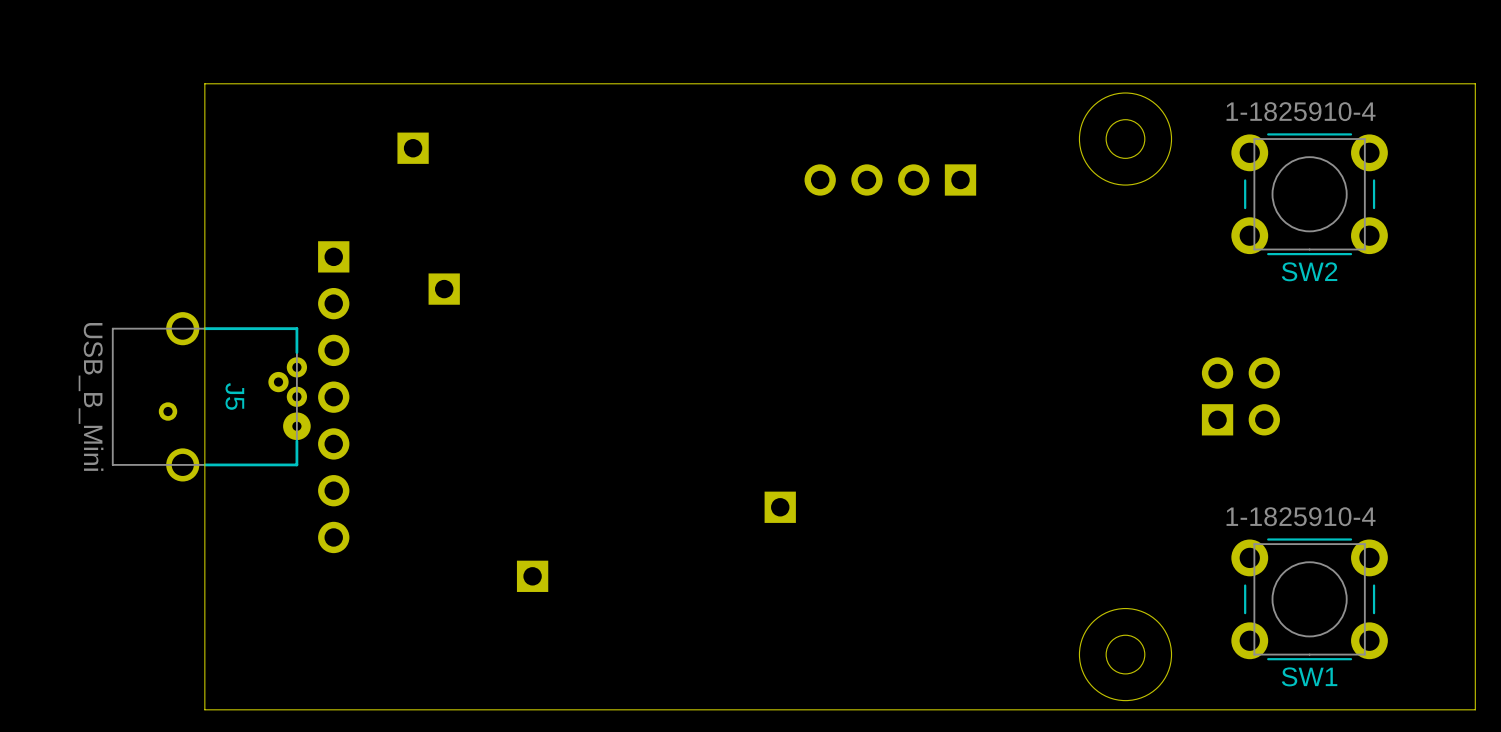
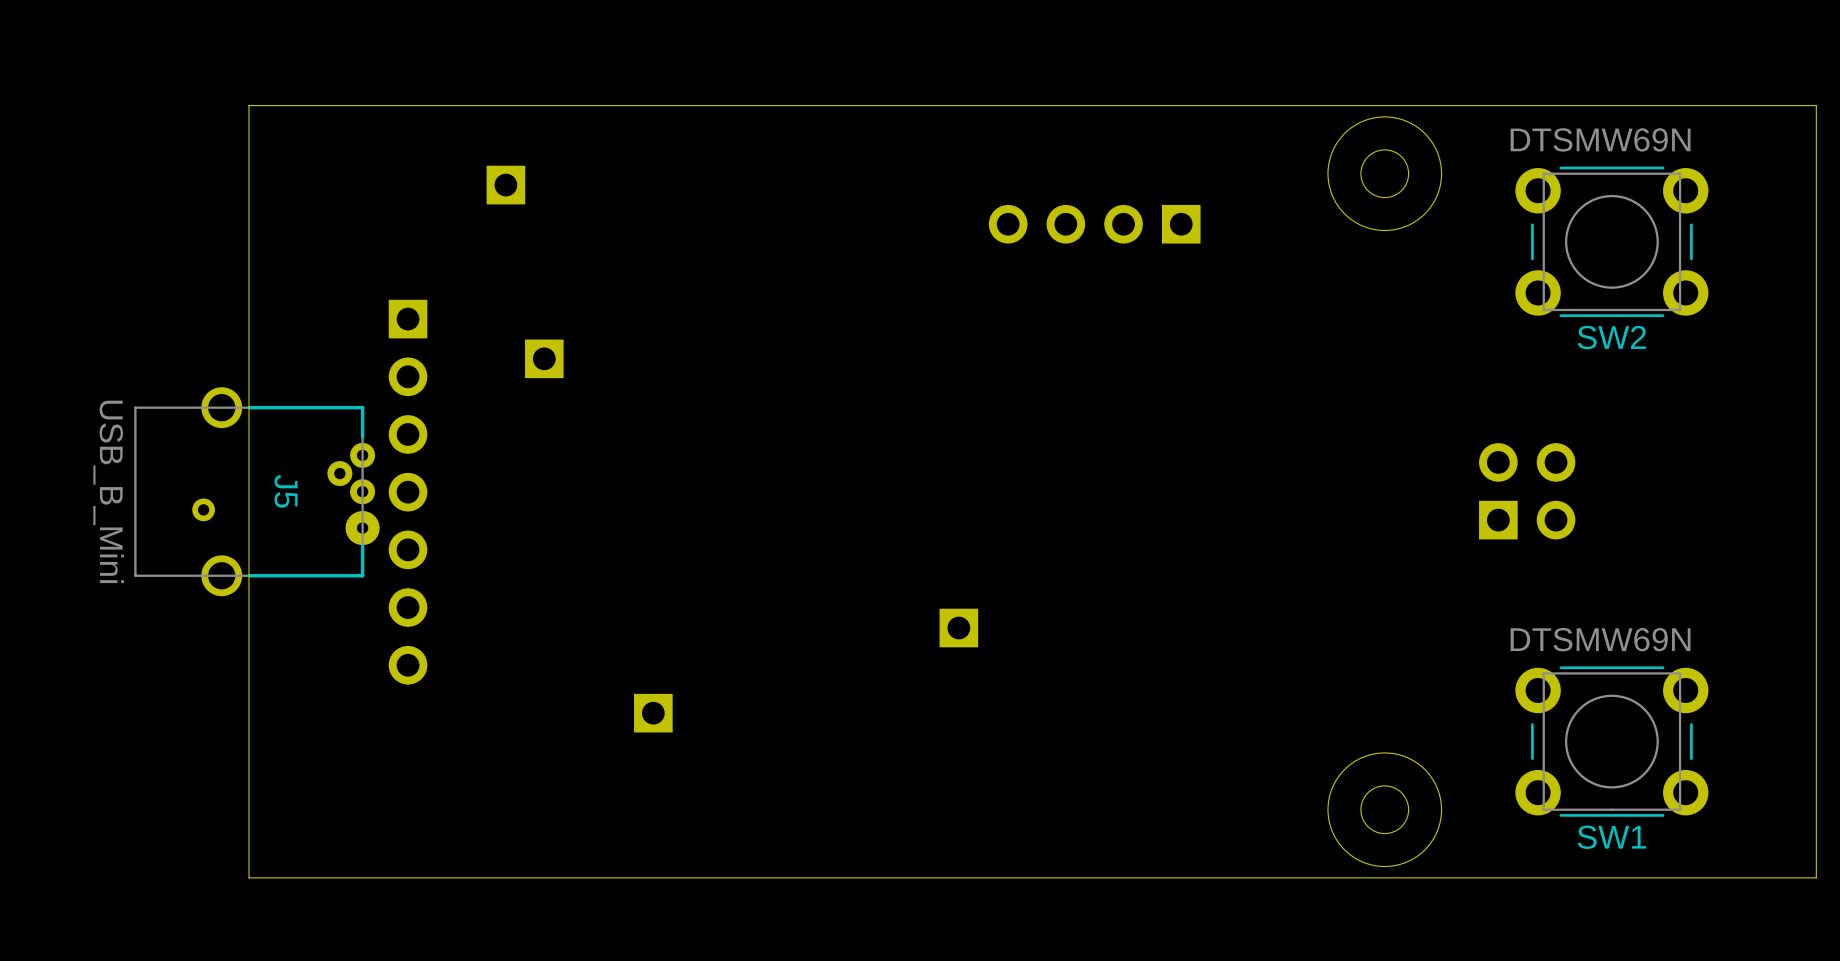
SW2 value: 1-1825910-4 (1301, 111) -> DTSMW69N (1600, 139)
SW1 value: 1-1825910-4 (1301, 516) -> DTSMW69N (1600, 639)

